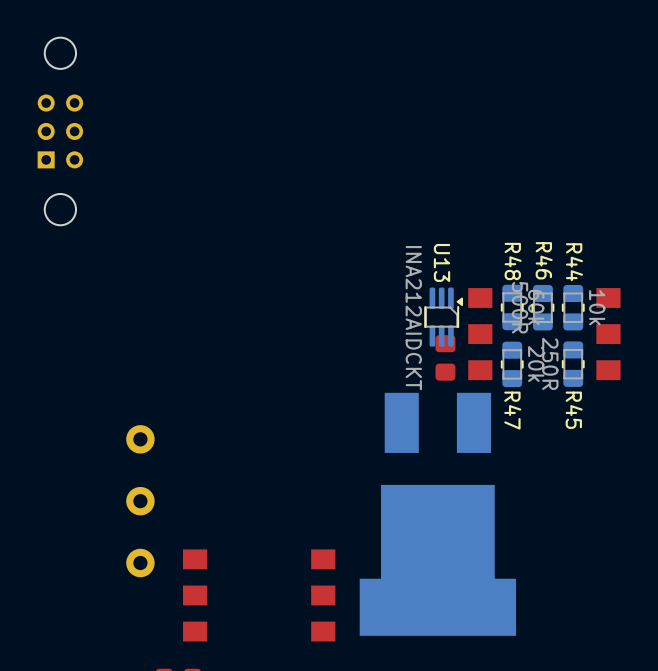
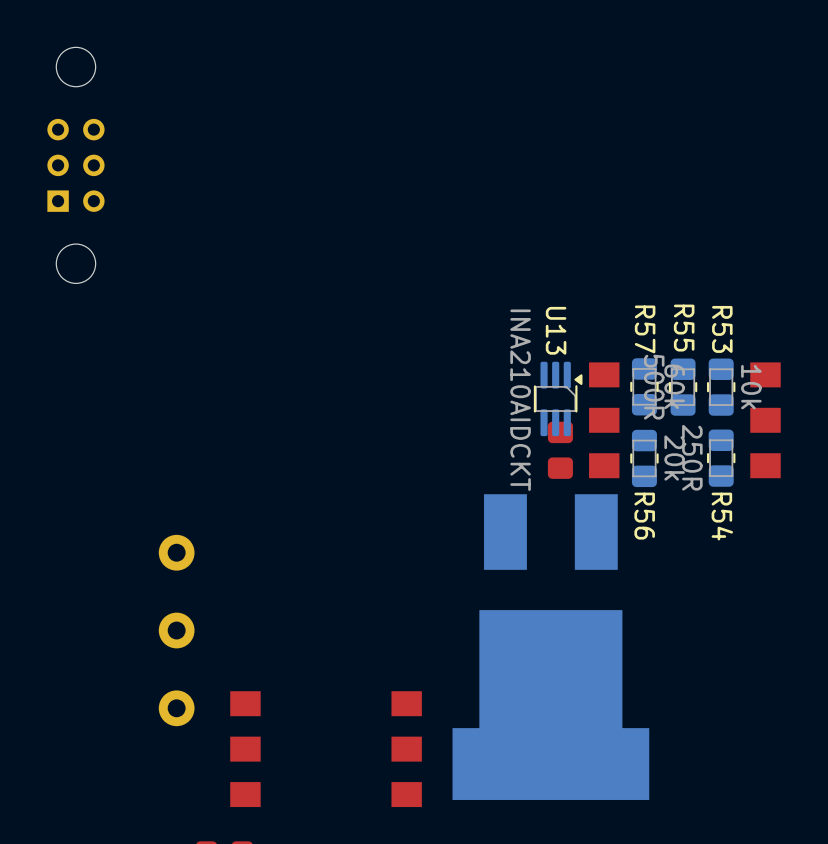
R46 name: R46 (544, 260) -> R55 (684, 328)
R48 name: R48 (513, 261) -> R57 (645, 329)
R44 name: R44 (574, 262) -> R53 (722, 329)
U13 value: INA212AIDCKT (413, 318) -> INA210AIDCKT (520, 400)
R47 name: R47 (512, 410) -> R56 (644, 516)
R45 name: R45 (574, 410) -> R54 (722, 516)

